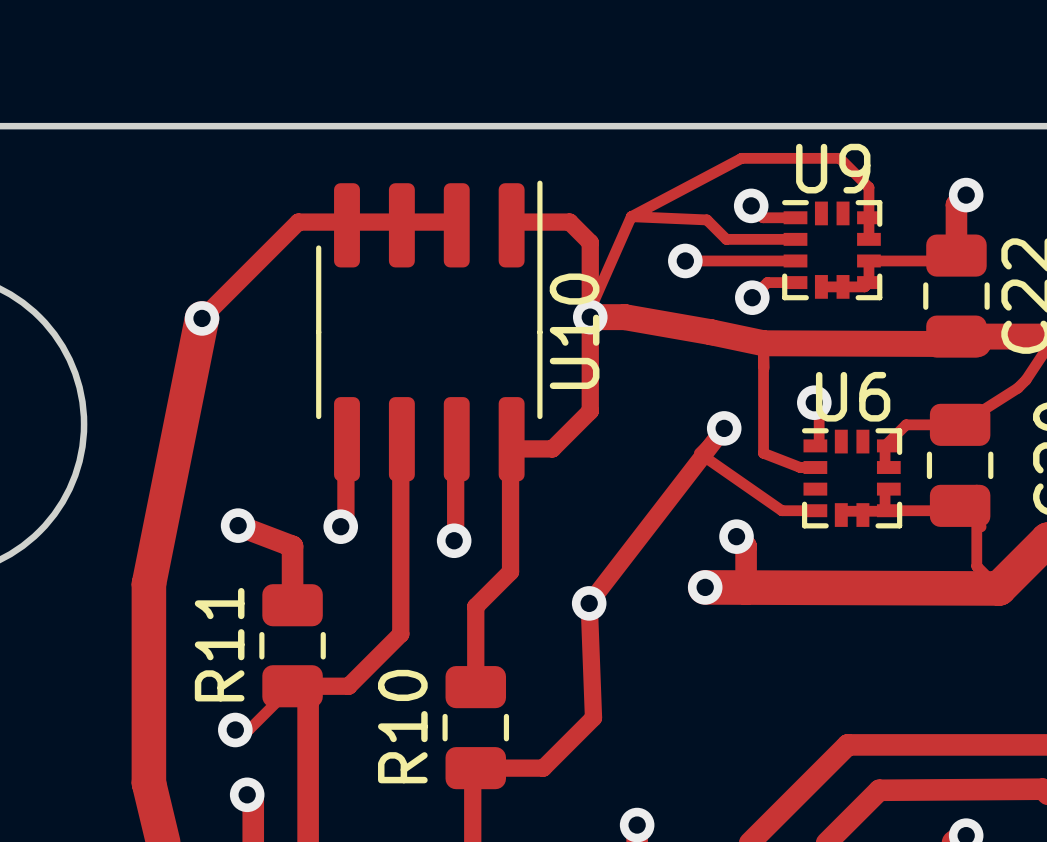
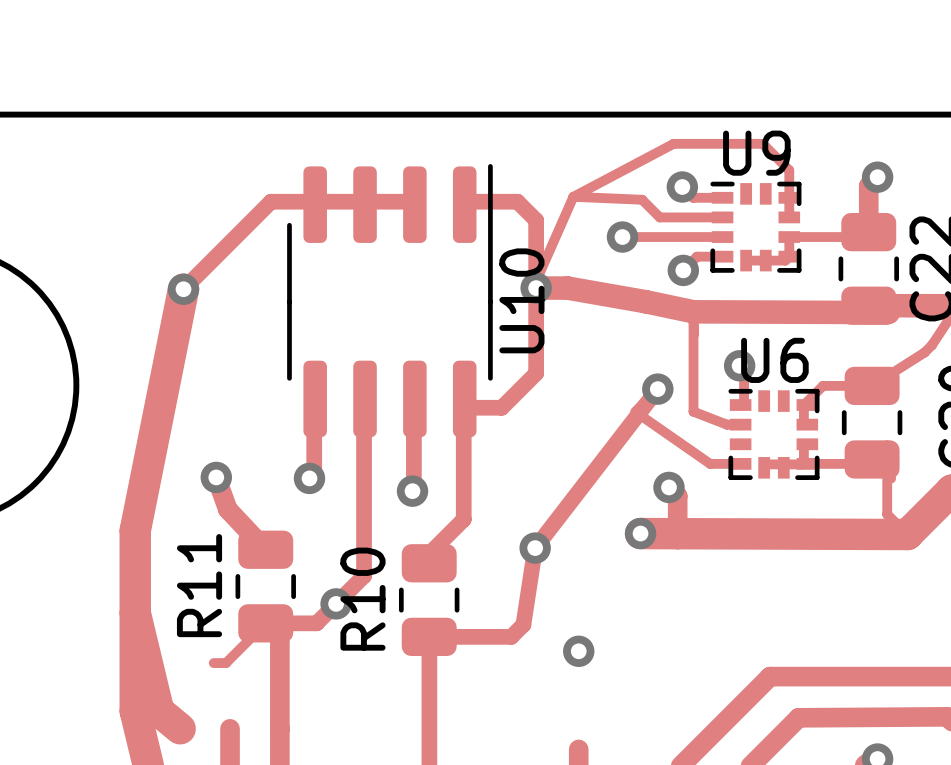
track: (238, 525) (292, 546) (292, 605) -> (216, 477) (227, 509) (265, 549)
track: (589, 603) (593, 717) (543, 768) (475, 768) (472, 771) -> (535, 548) (523, 624) (511, 636) (429, 636)
track: (475, 606) (475, 687) -> none
via: none -> (336, 603)
track: none -> (135, 613) (158, 711) (180, 728)
track: none -> (429, 637) (429, 700)
via: none -> (578, 651)
R10 position: (475, 727) -> (429, 600)
via: (235, 730) -> none
via: (247, 794) -> none
via: (637, 825) -> none

